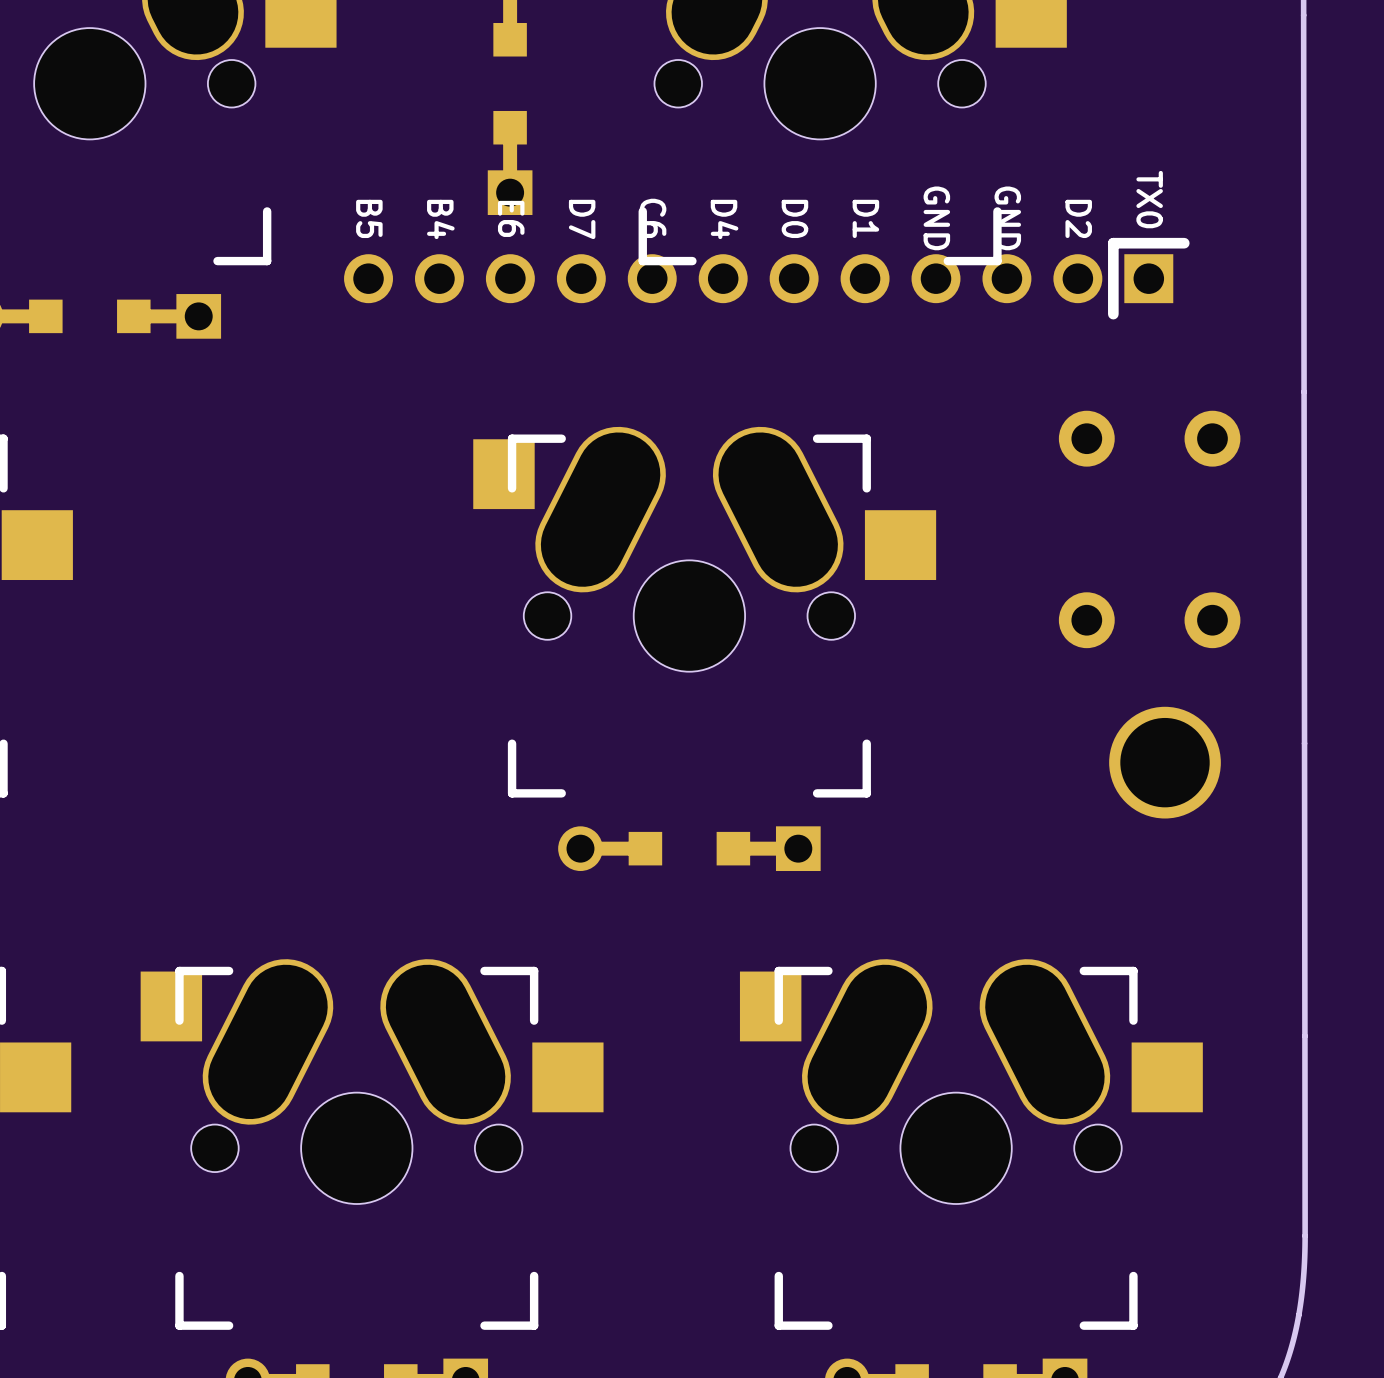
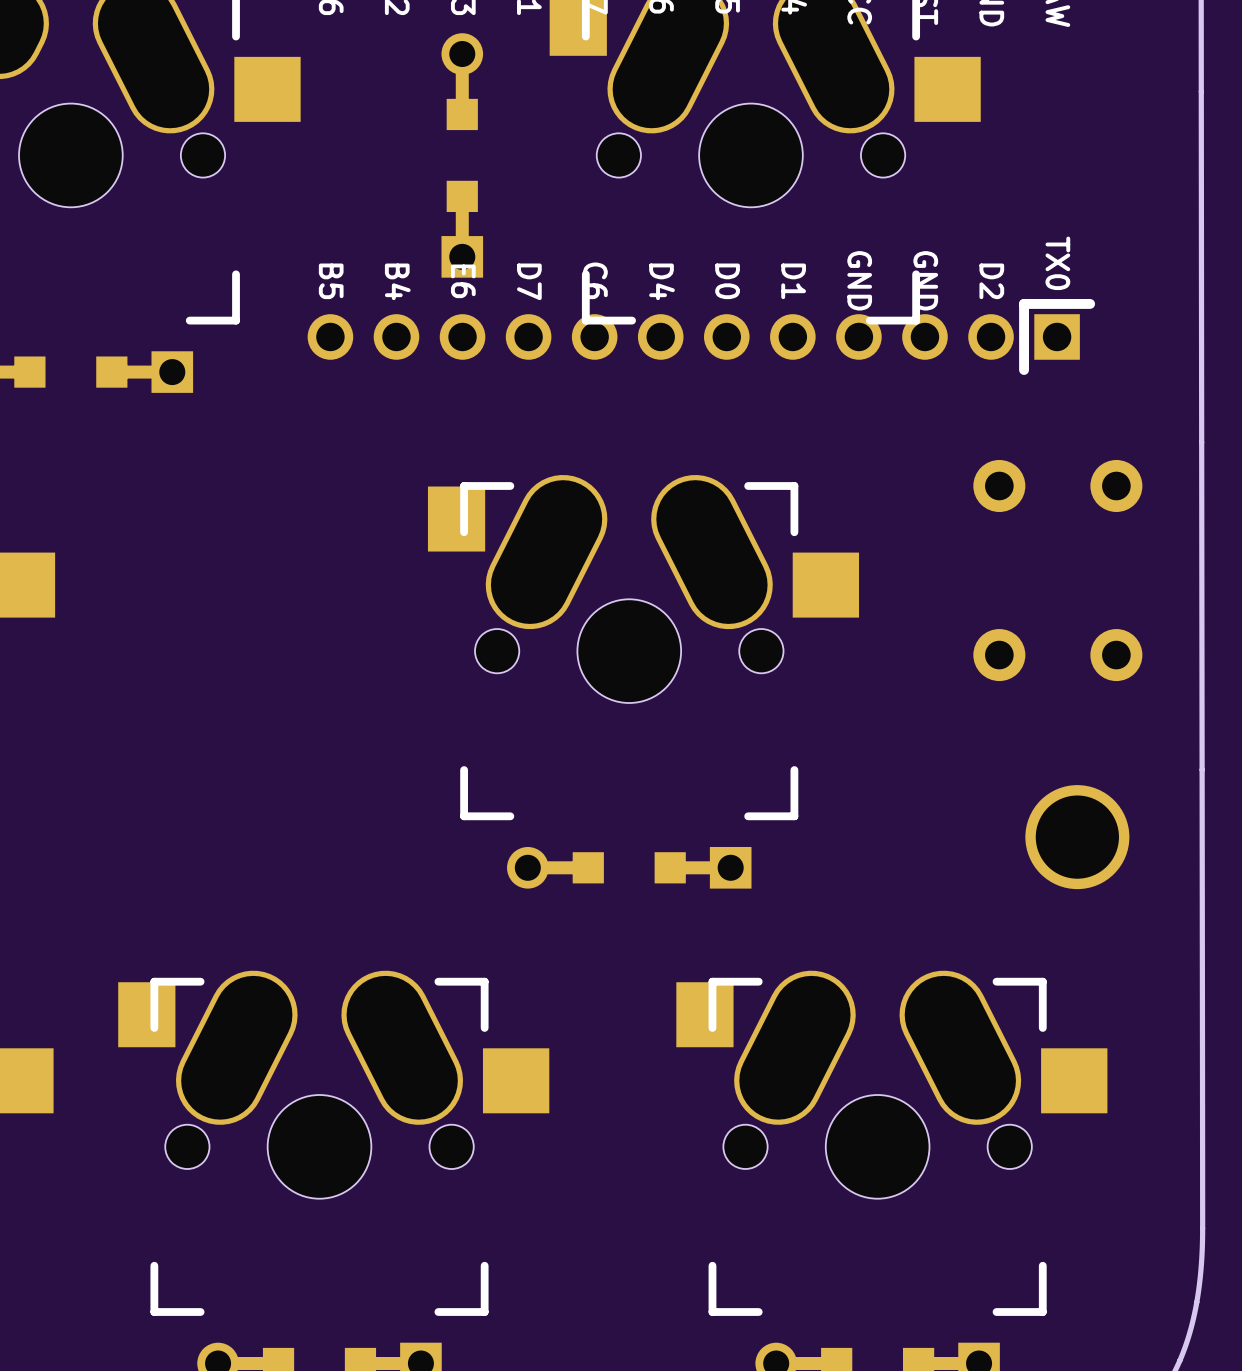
part position: (1165, 762) -> (1077, 837)

